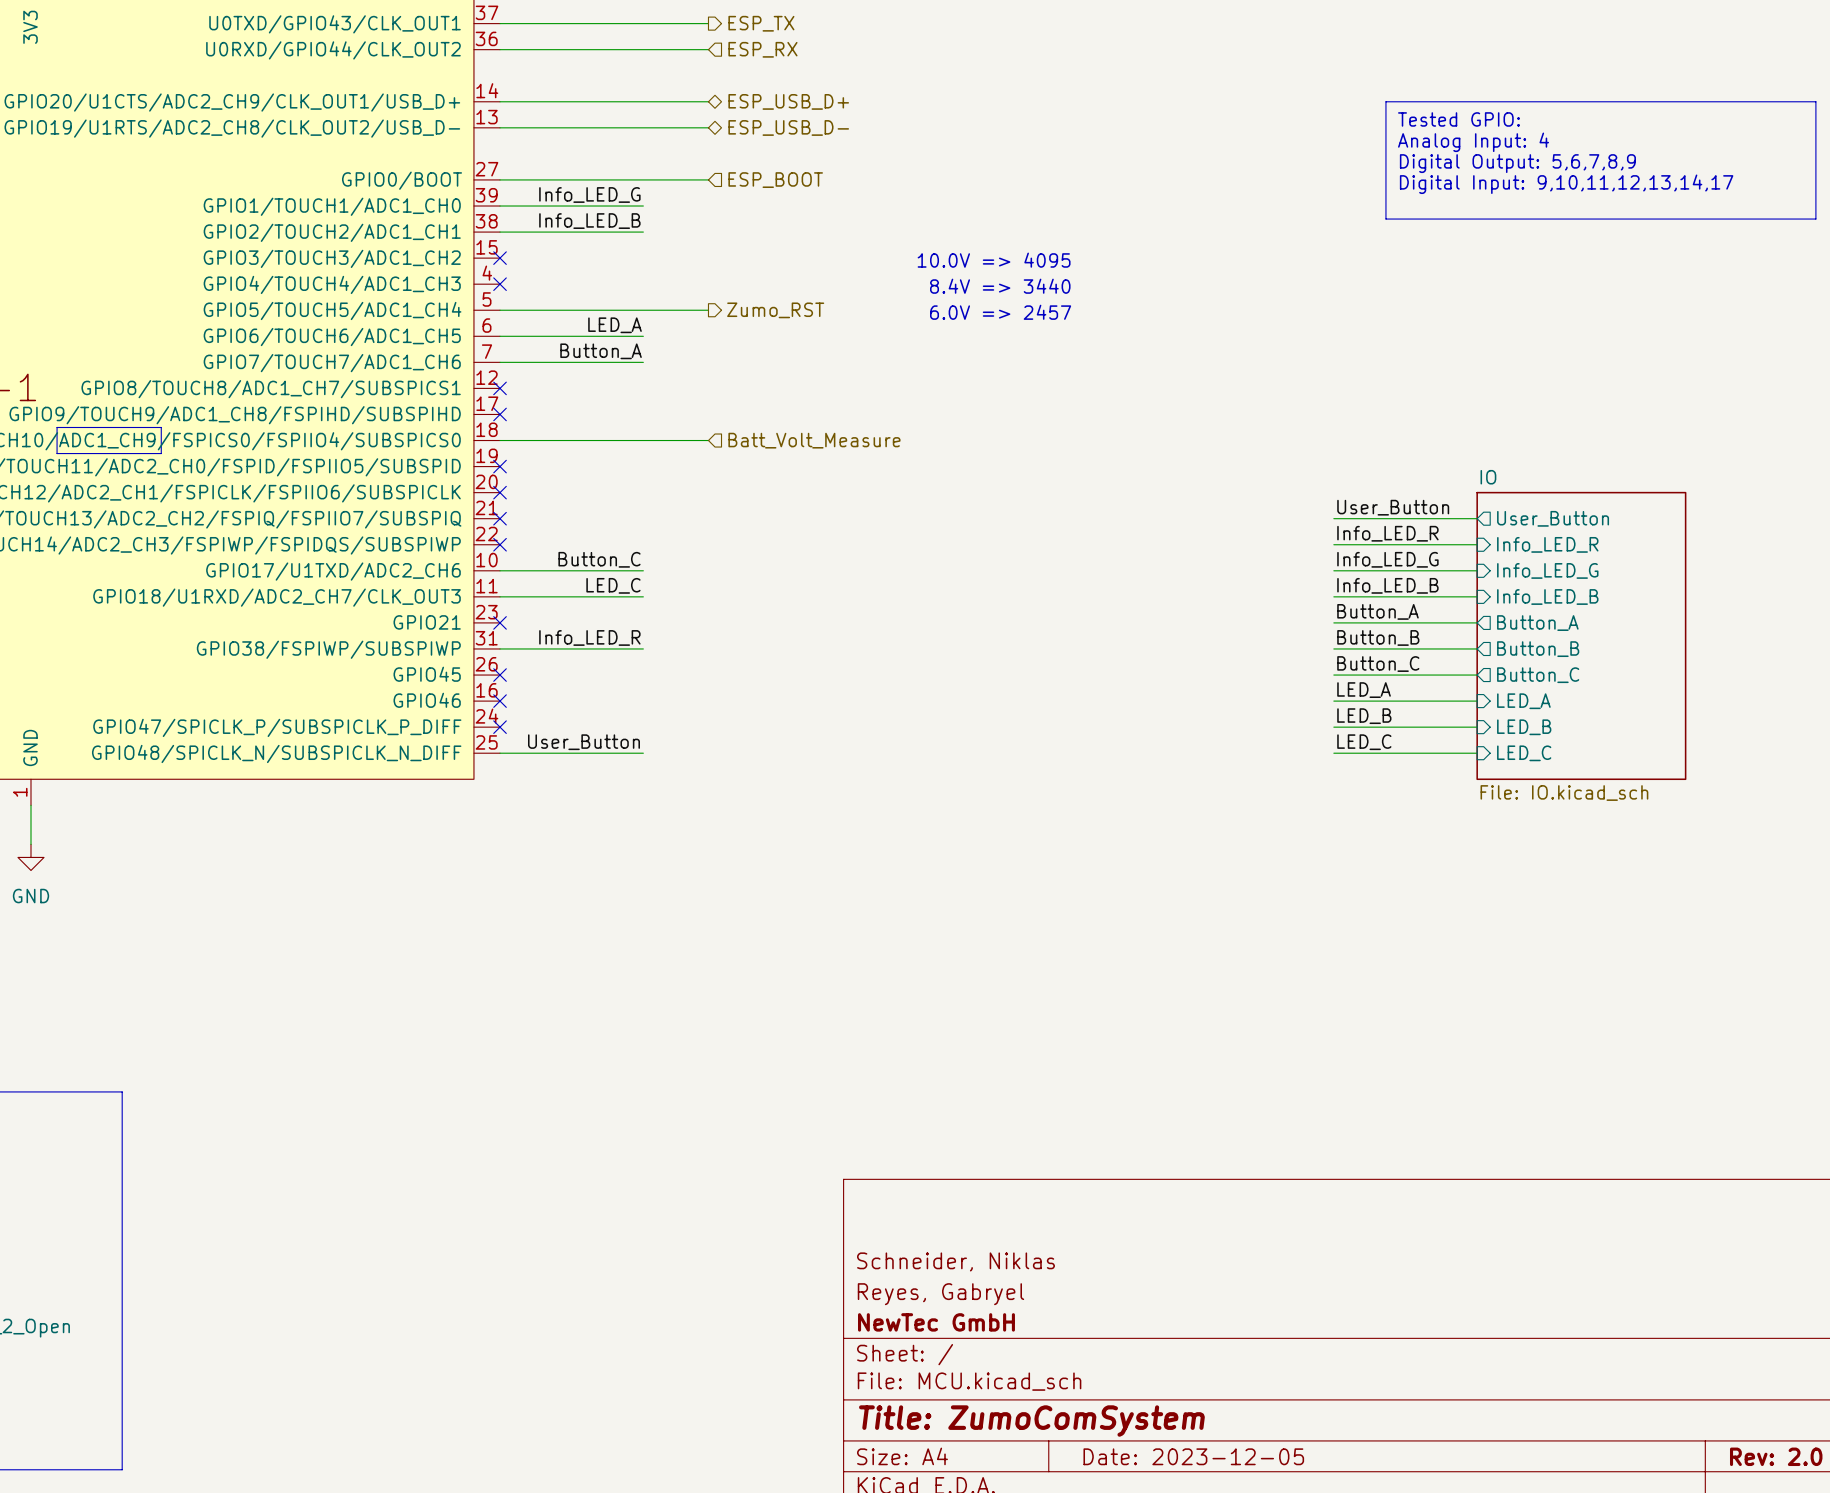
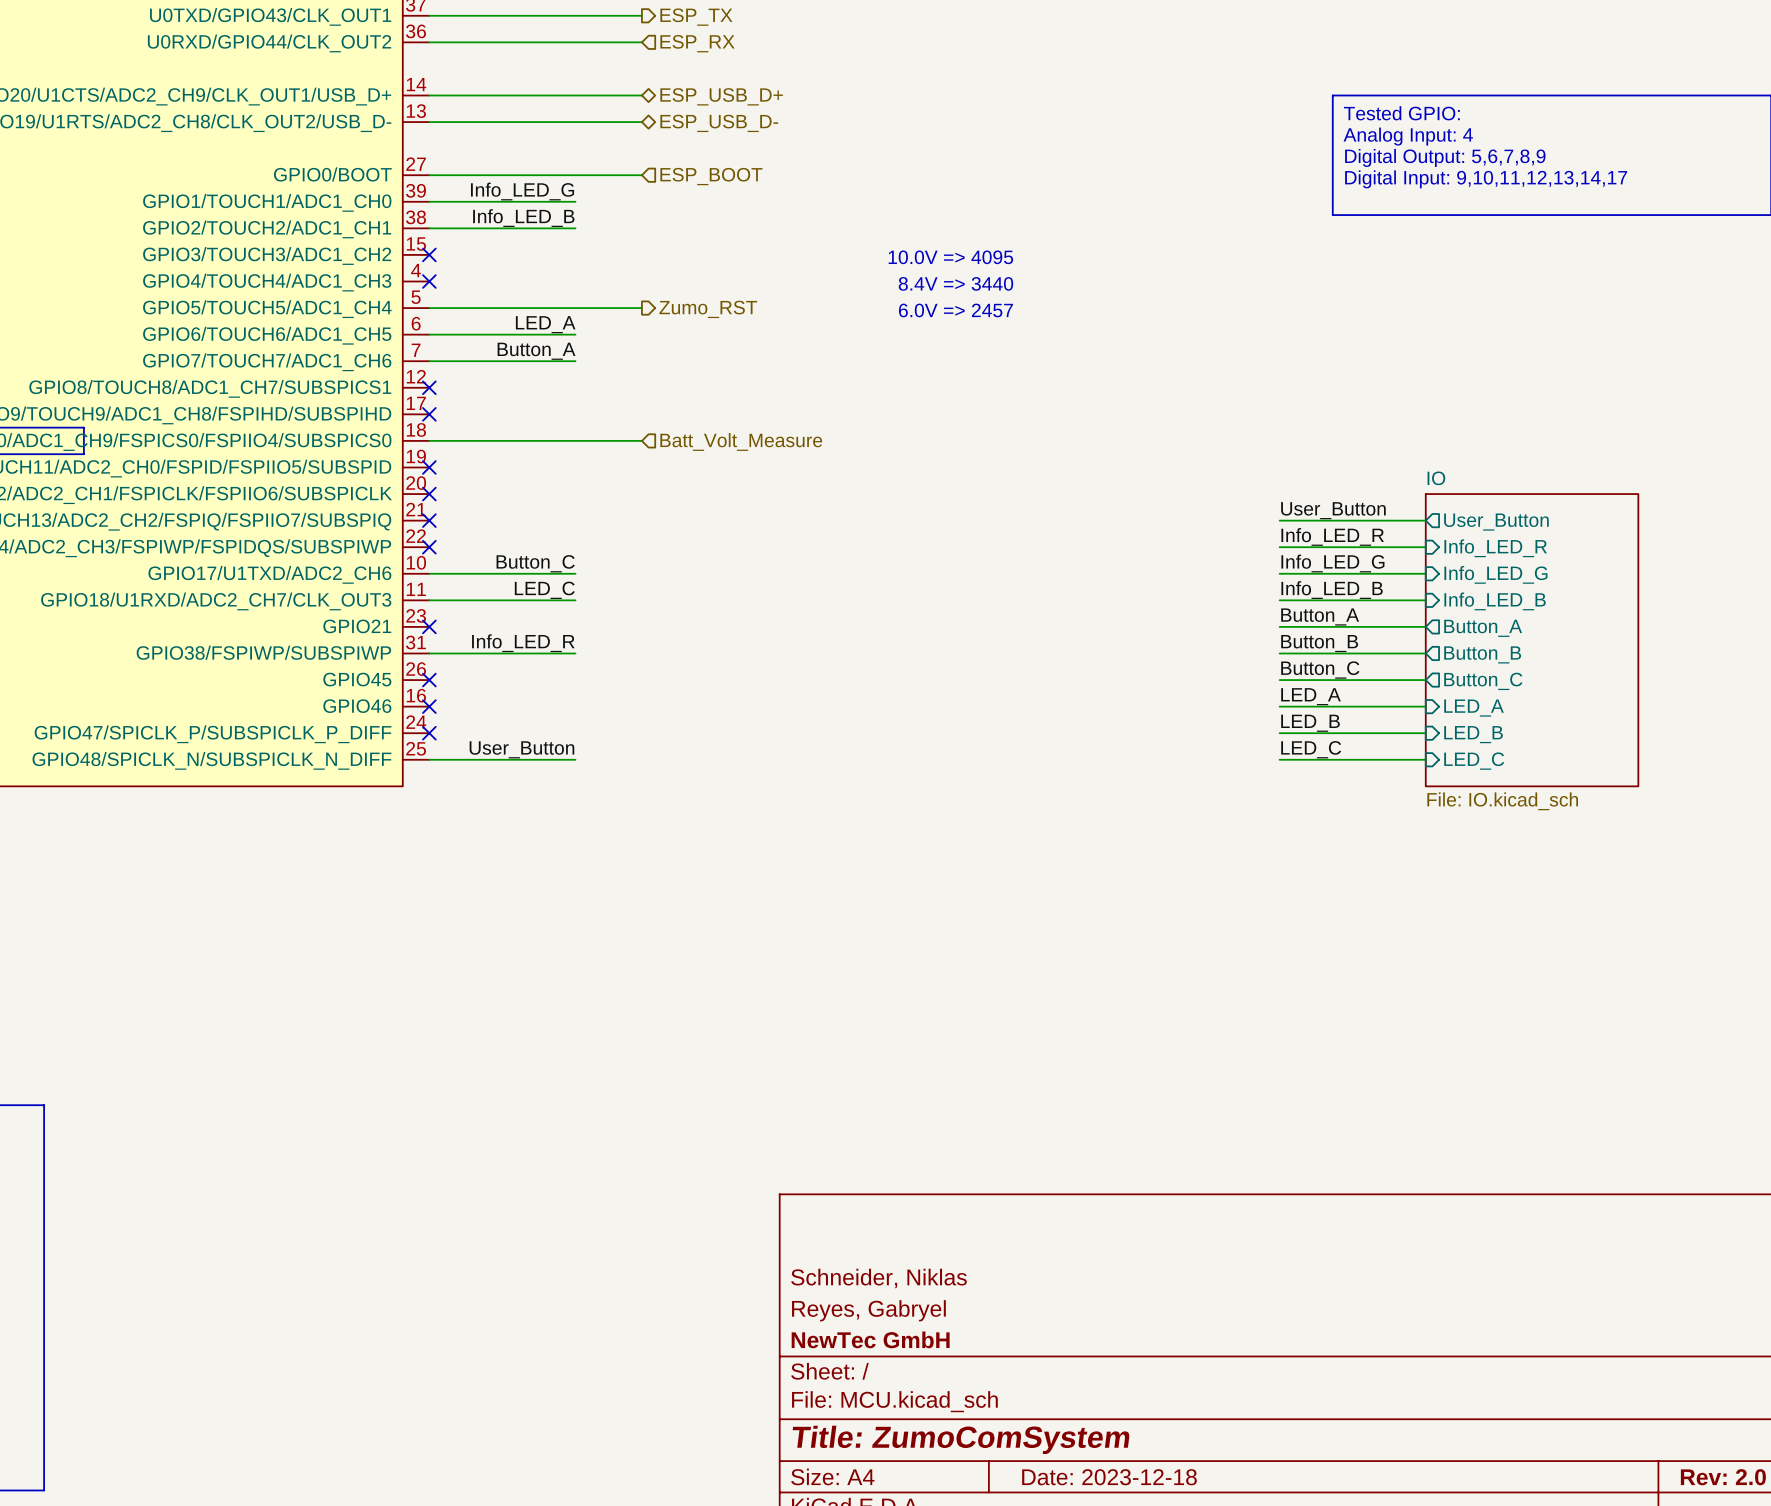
title block: Date: 2023-12-05 (1193, 1456) -> Date: 2023-12-18 (1109, 1477)

